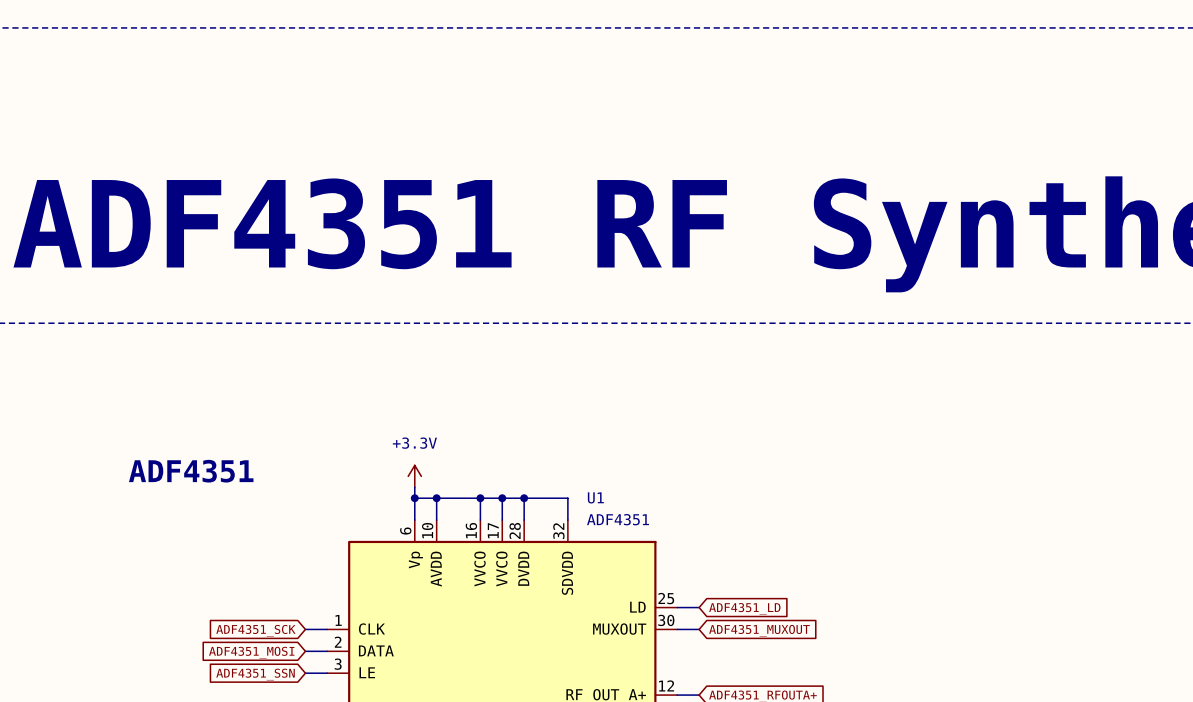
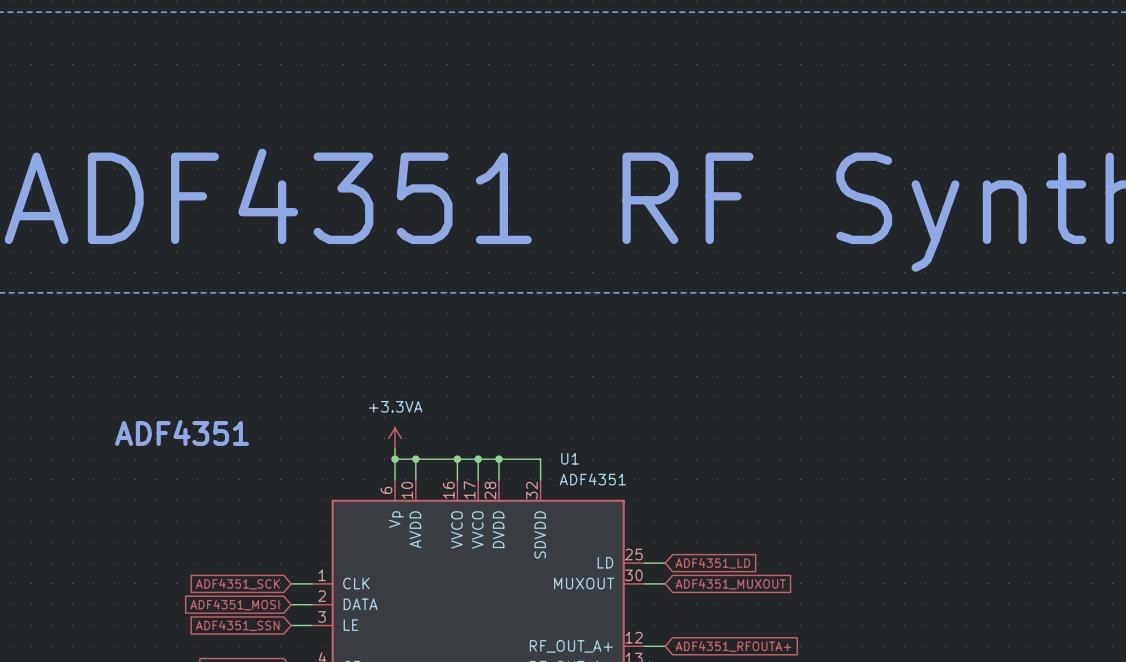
power symbol: +3.3V (414, 476) -> +3.3VA (395, 438)

